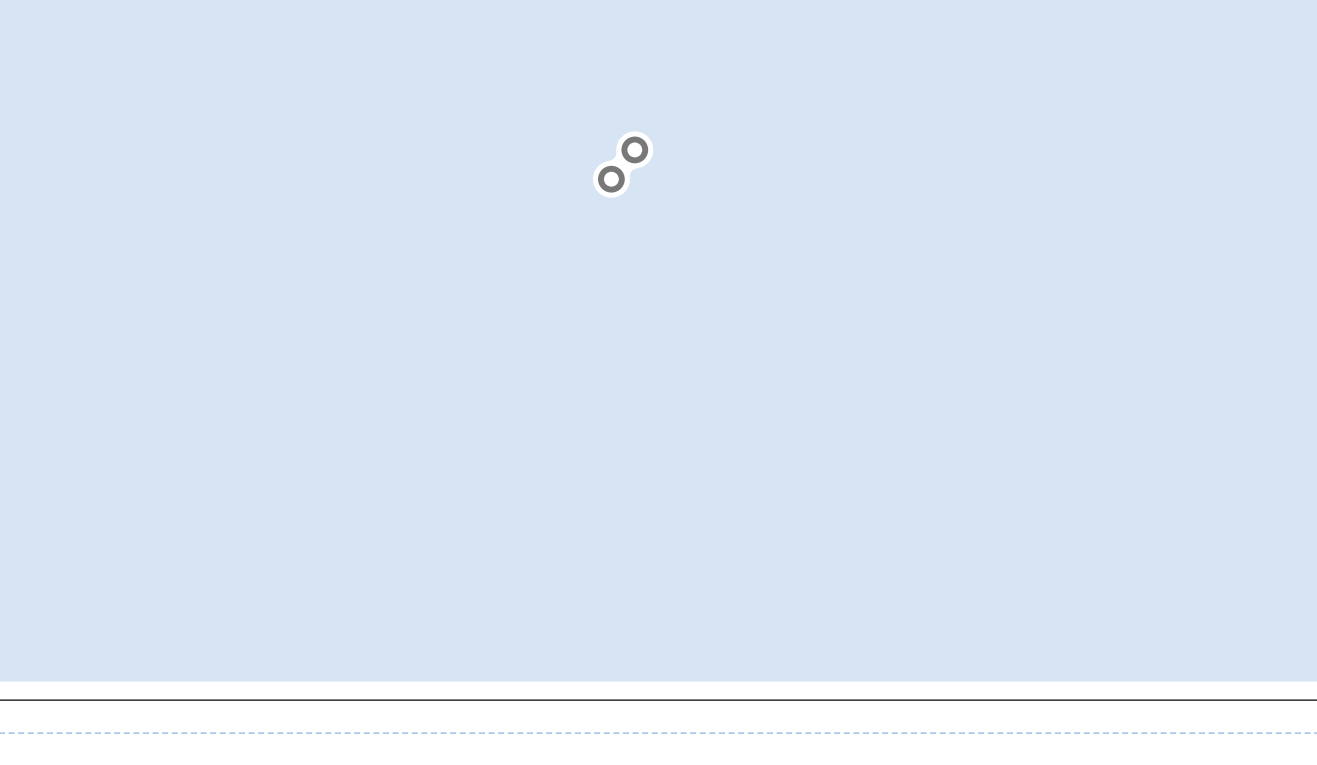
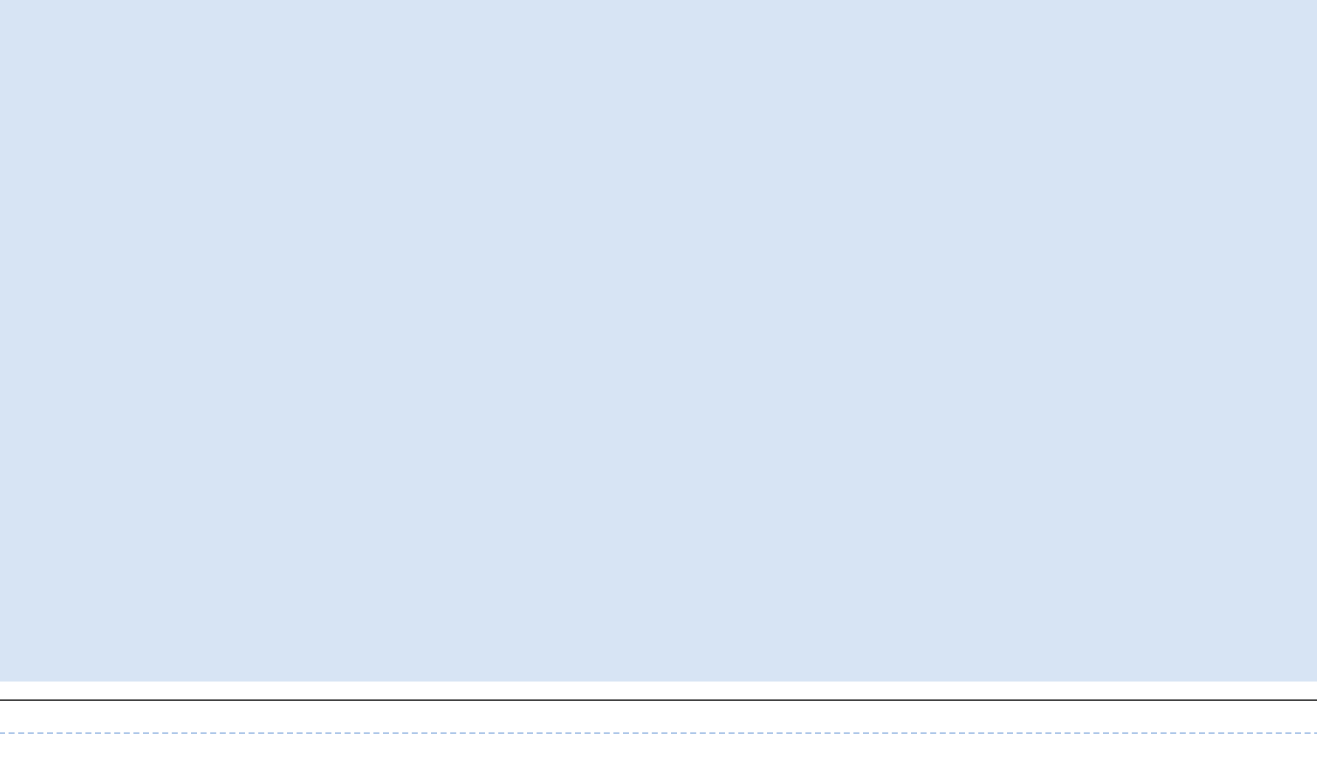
via: (634, 149) -> none
via: (611, 179) -> none

